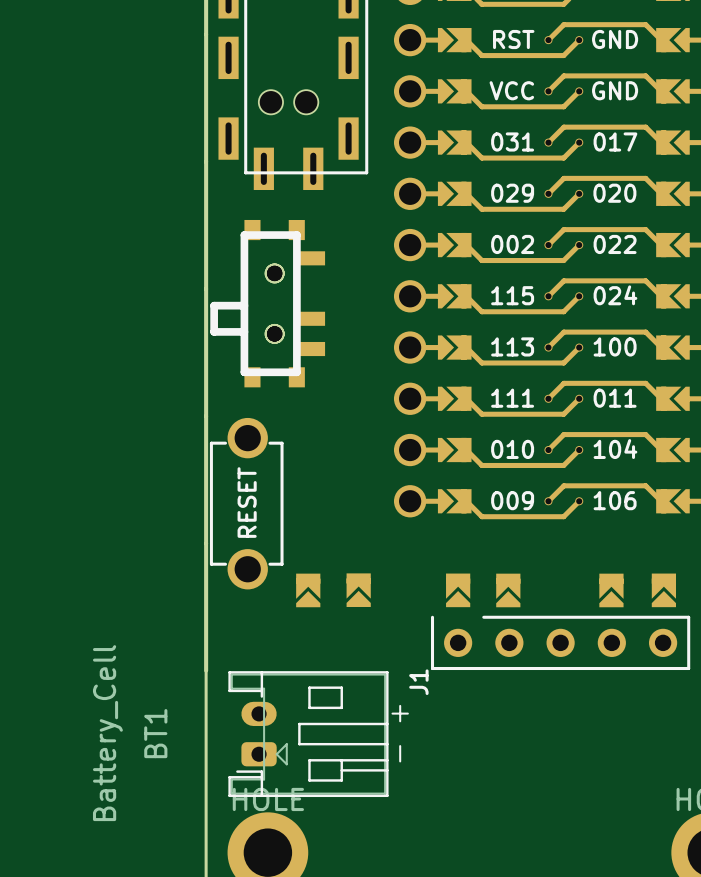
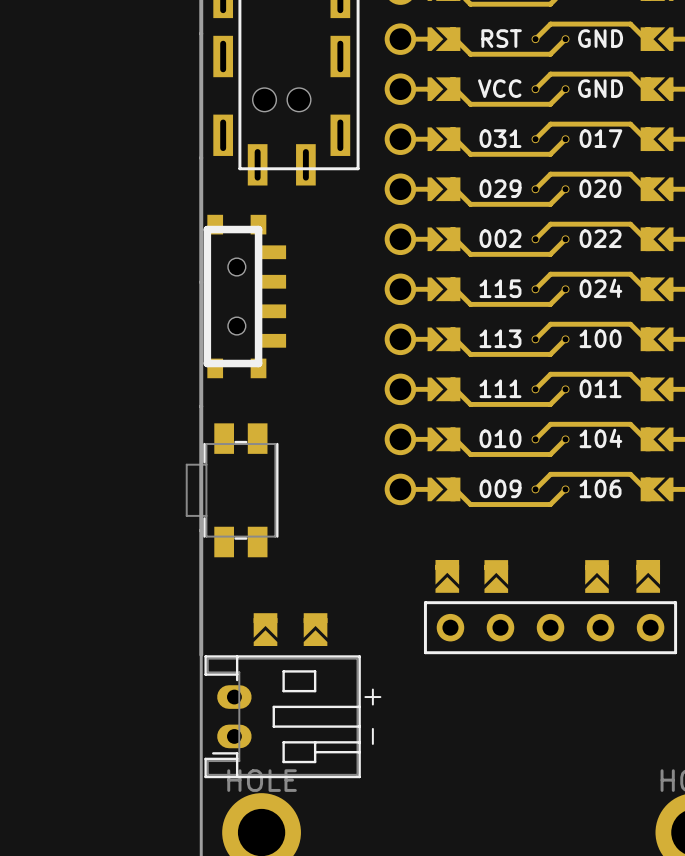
part: none -> (244, 296)
part: (267, 303) -> none
part: (274, 303) -> none
part footprint: [209, 417, 284, 590] -> [185, 423, 279, 558]
part: (308, 590) -> none
part: (358, 590) -> none
J1: (560, 642) -> none
part: none -> (550, 627)
part: none -> (265, 629)
part: none -> (315, 629)
part: none -> (282, 716)
BT1: Battery_Cell (308, 734) -> none

